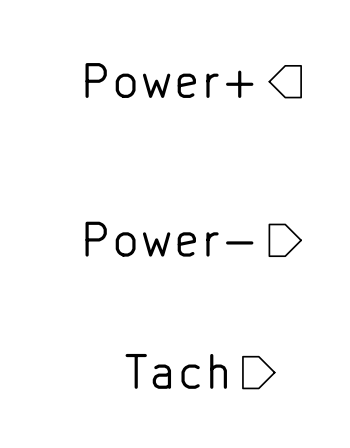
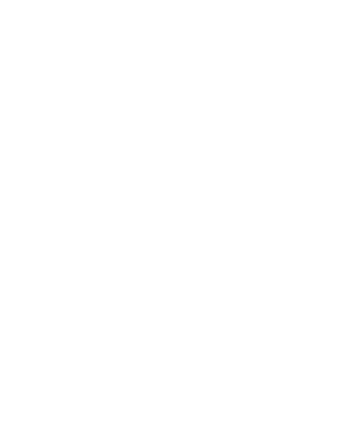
hierarchical label: Power+ (169, 80) -> none
hierarchical label: Power- (169, 239) -> none
hierarchical label: Tach (176, 371) -> none

